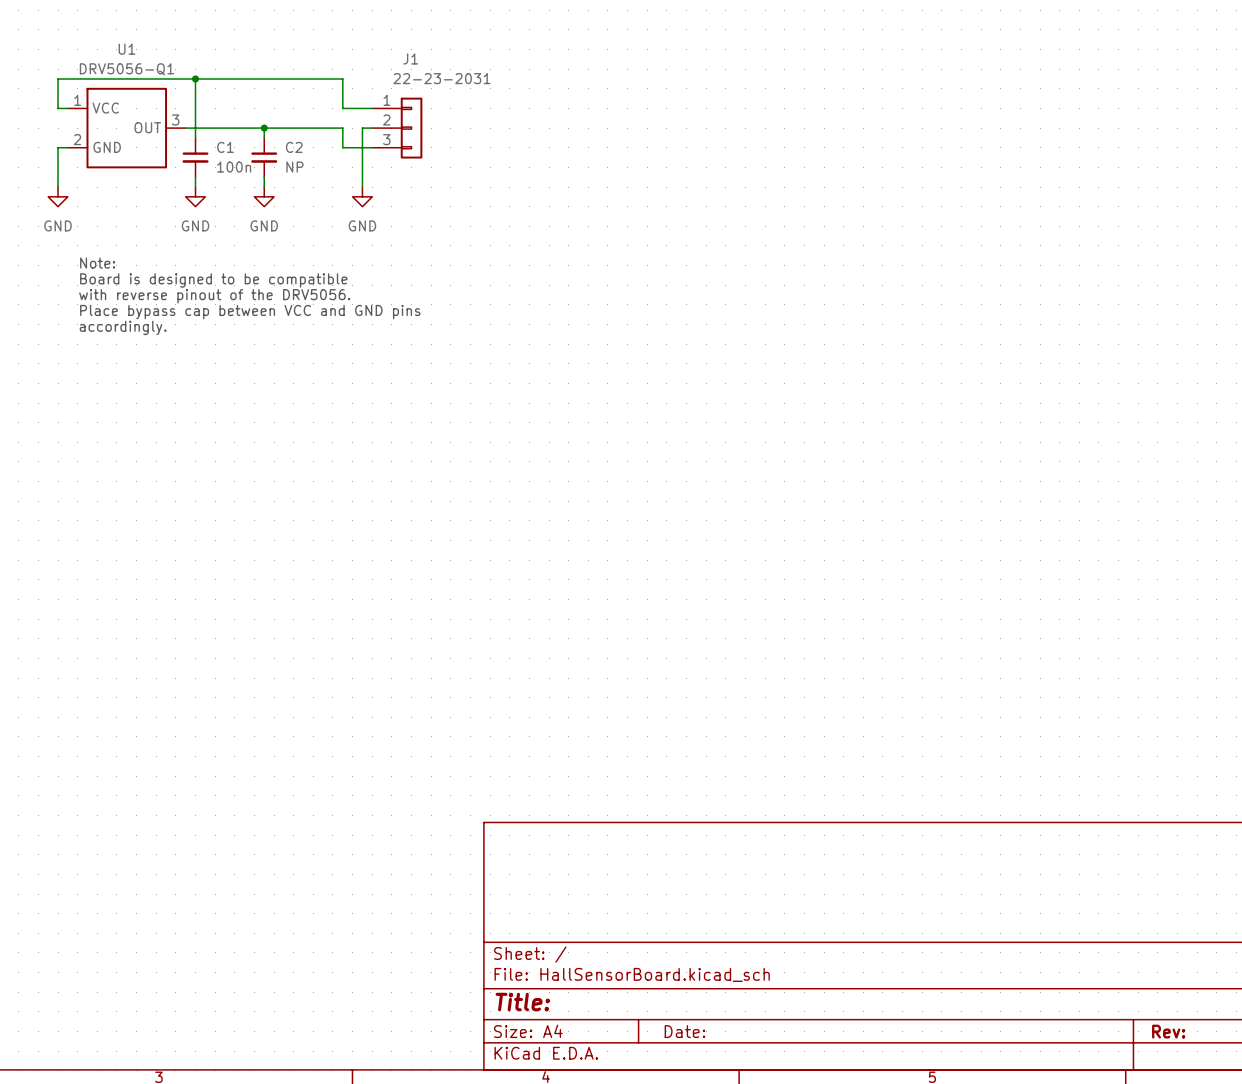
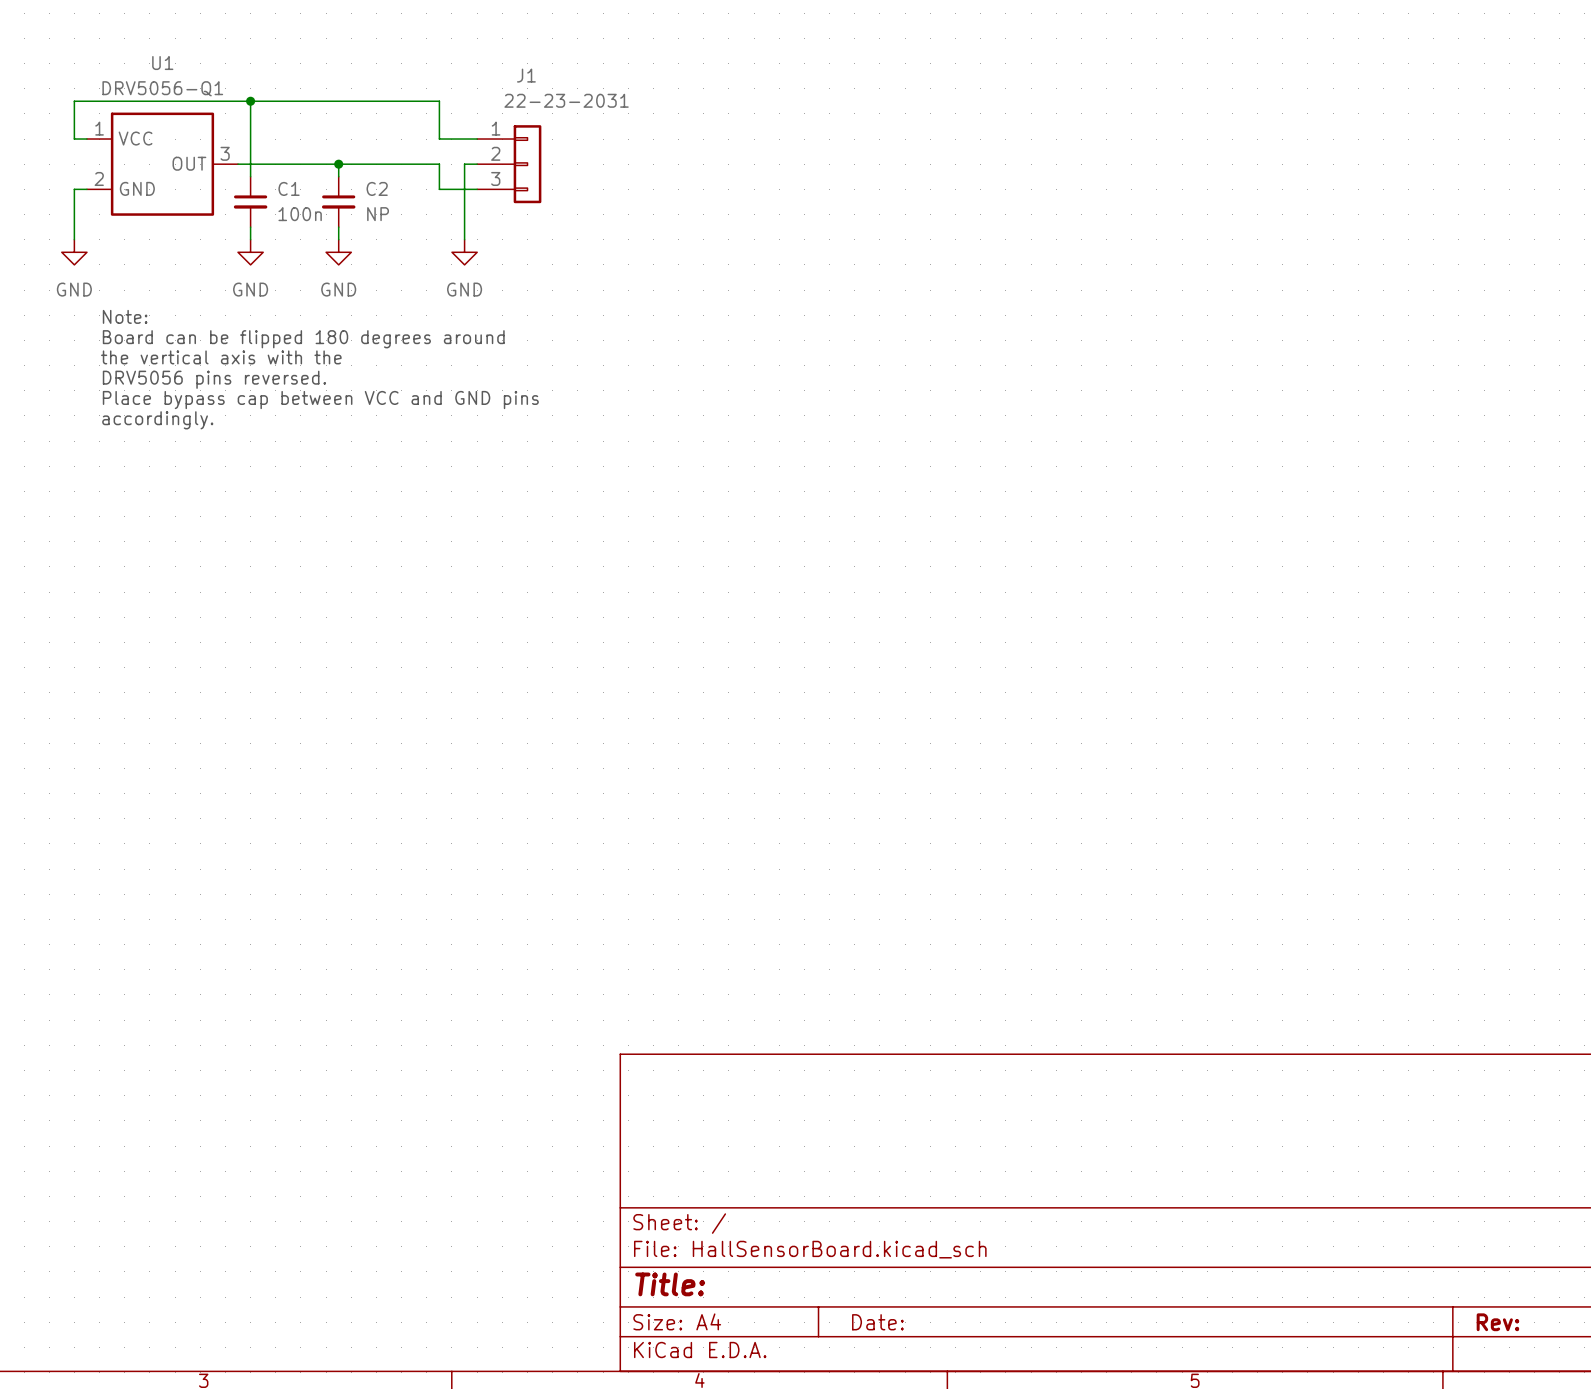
text: none -> Note: (125, 316)
text: Note: (97, 263) -> Board can be flipped 180 degrees around (303, 339)
text: Board is designed to be compatible (213, 280) -> the vertical axis with the (221, 357)
text: with reverse pinout of the DRV5056. (214, 296) -> DRV5056 pins reversed. (214, 379)

